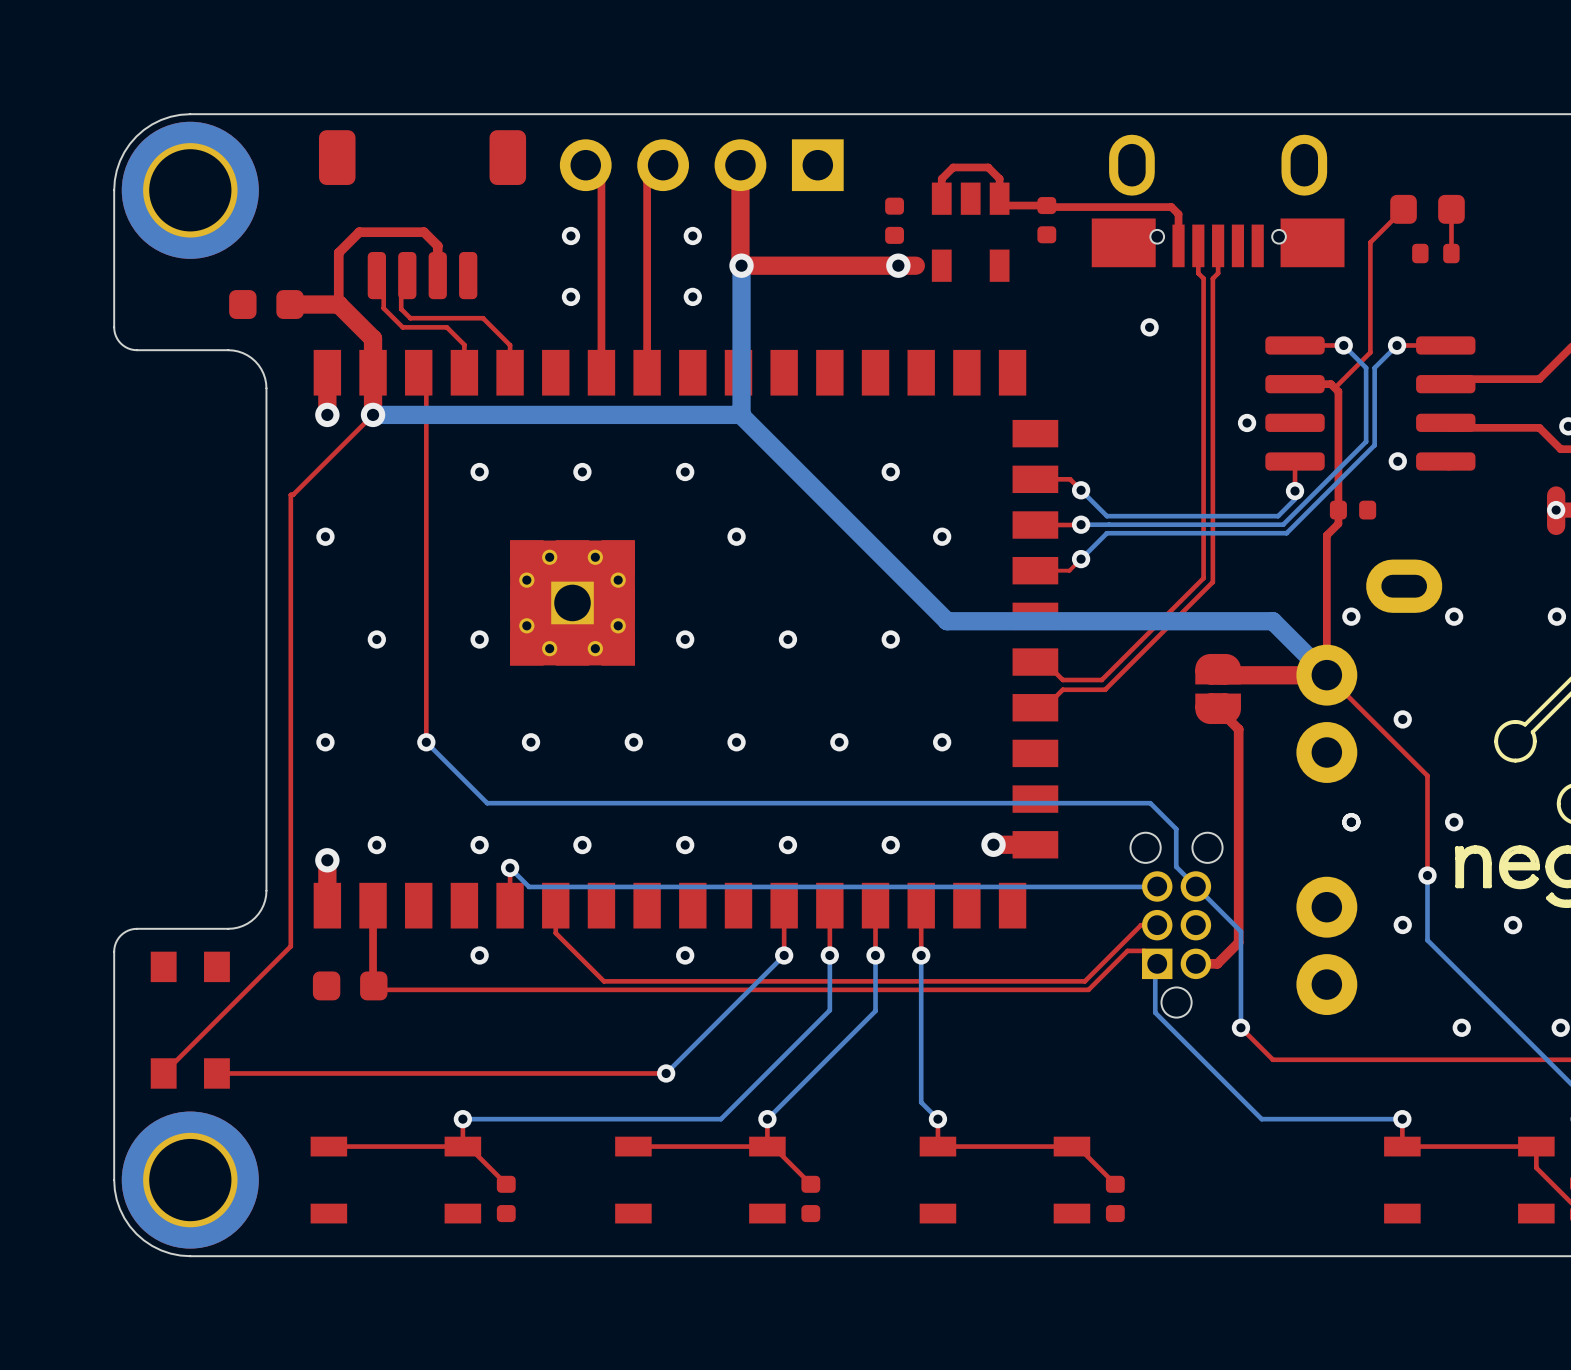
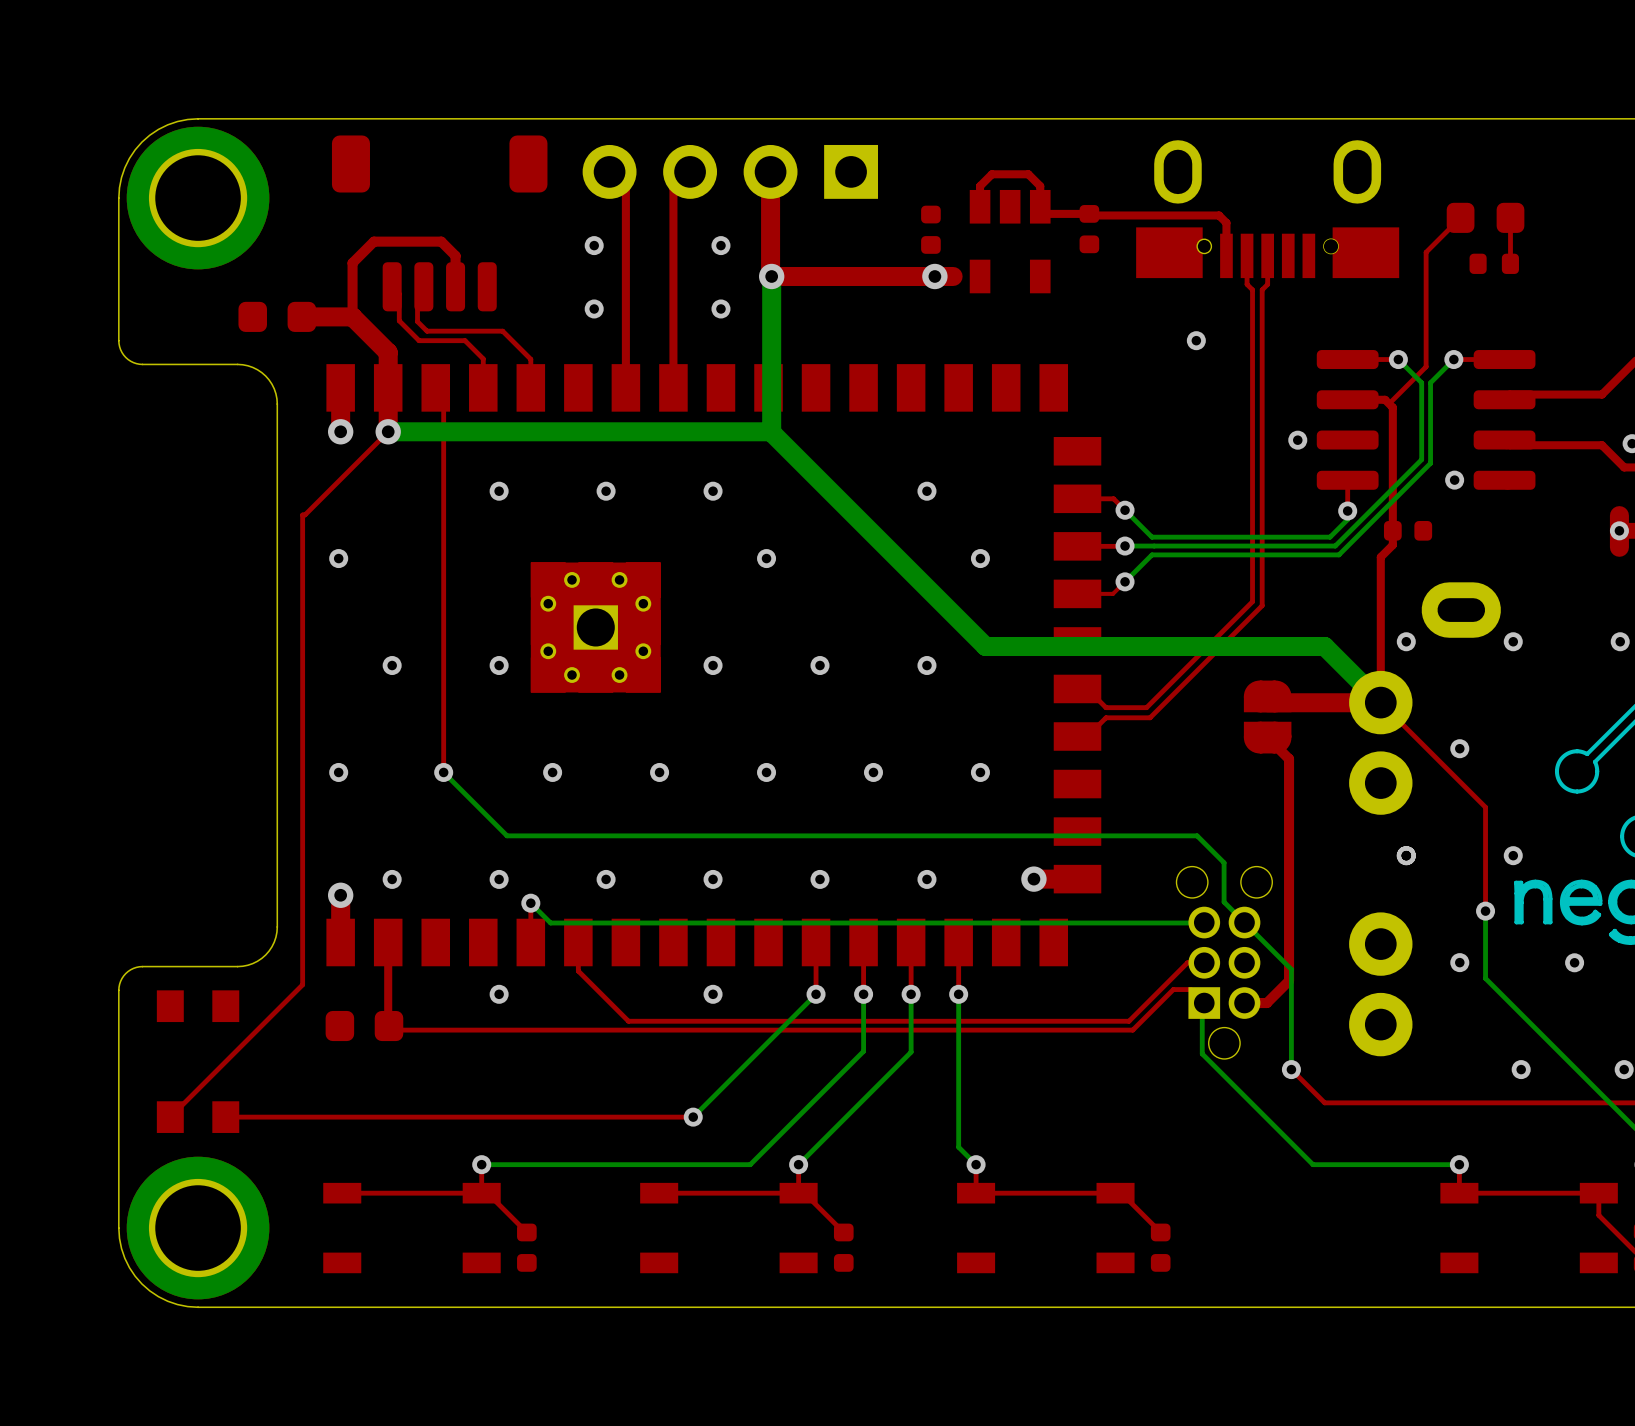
part footprint: [1091, 134, 1345, 268] -> [1136, 140, 1400, 279]

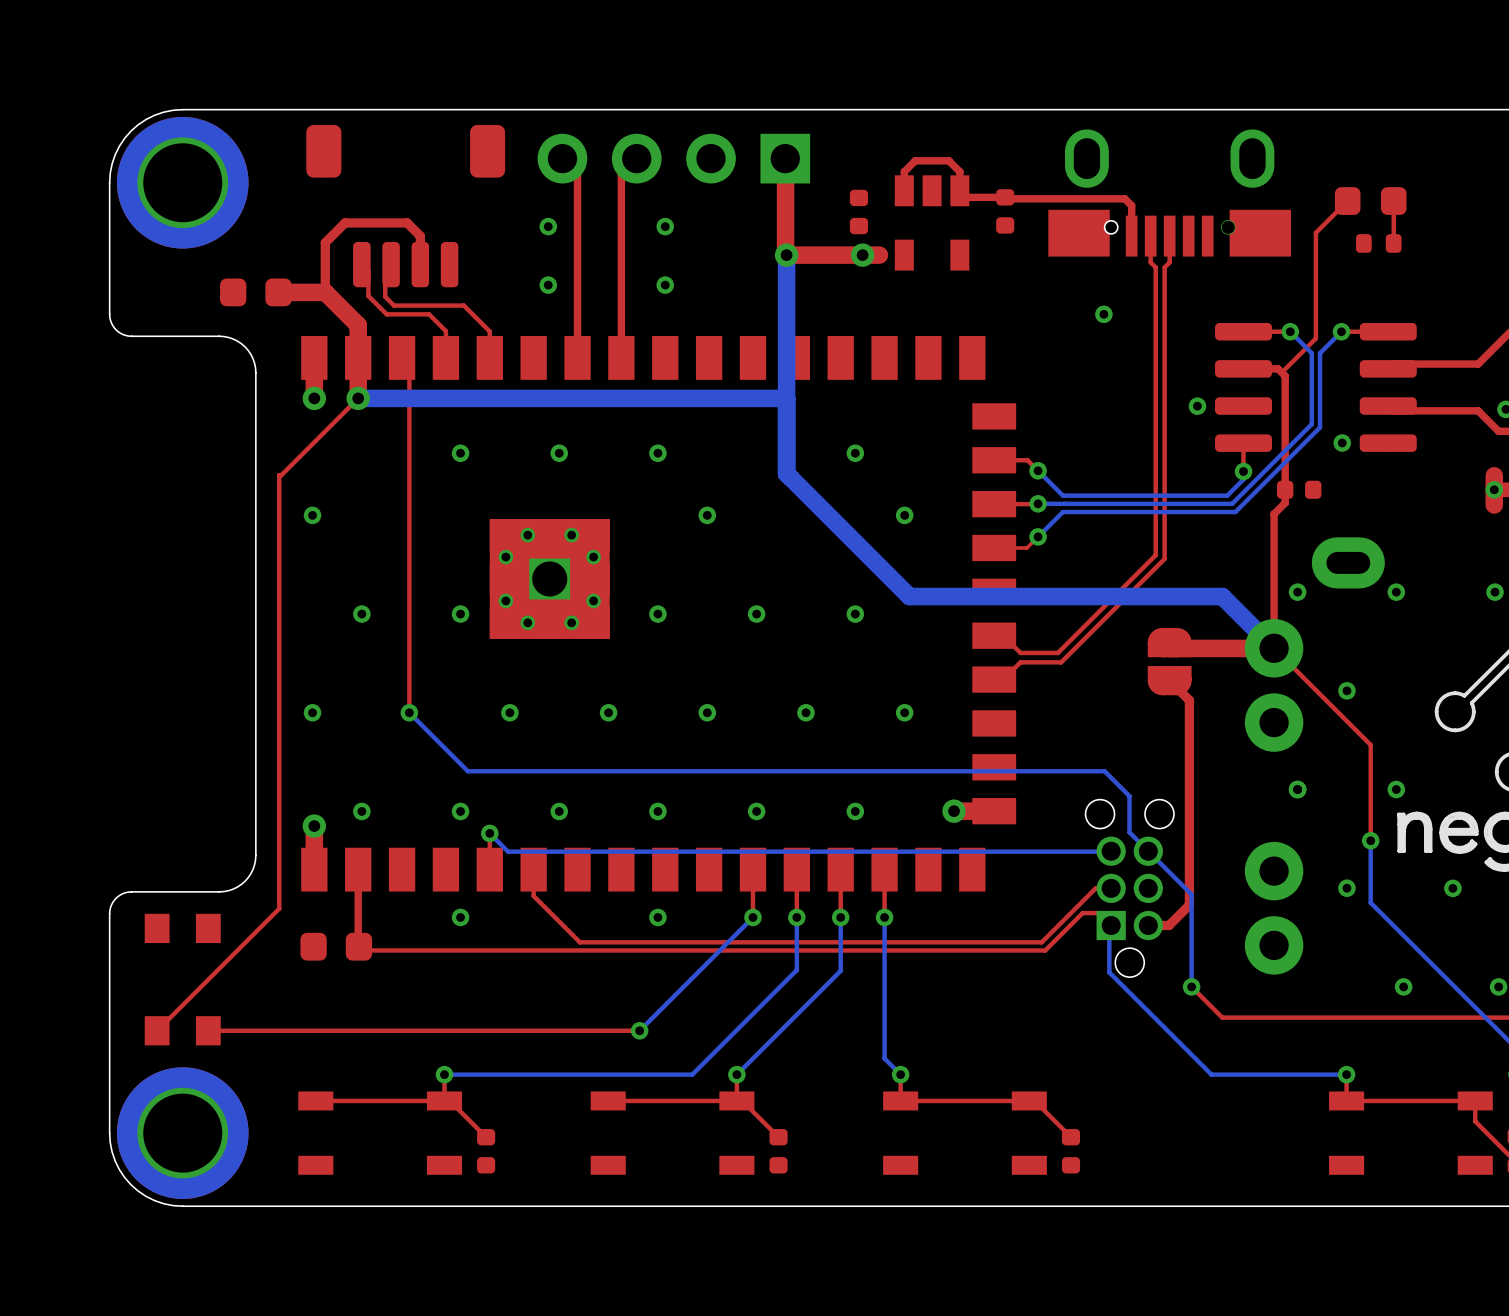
top track: (770, 171) (770, 275) (852, 276) -> (785, 158) (786, 255)
bottom track: (771, 276) (771, 432) (852, 513) -> (786, 255) (786, 473)
via position: (771, 276) -> (786, 255)
bottom track: none -> (786, 398) (712, 398)

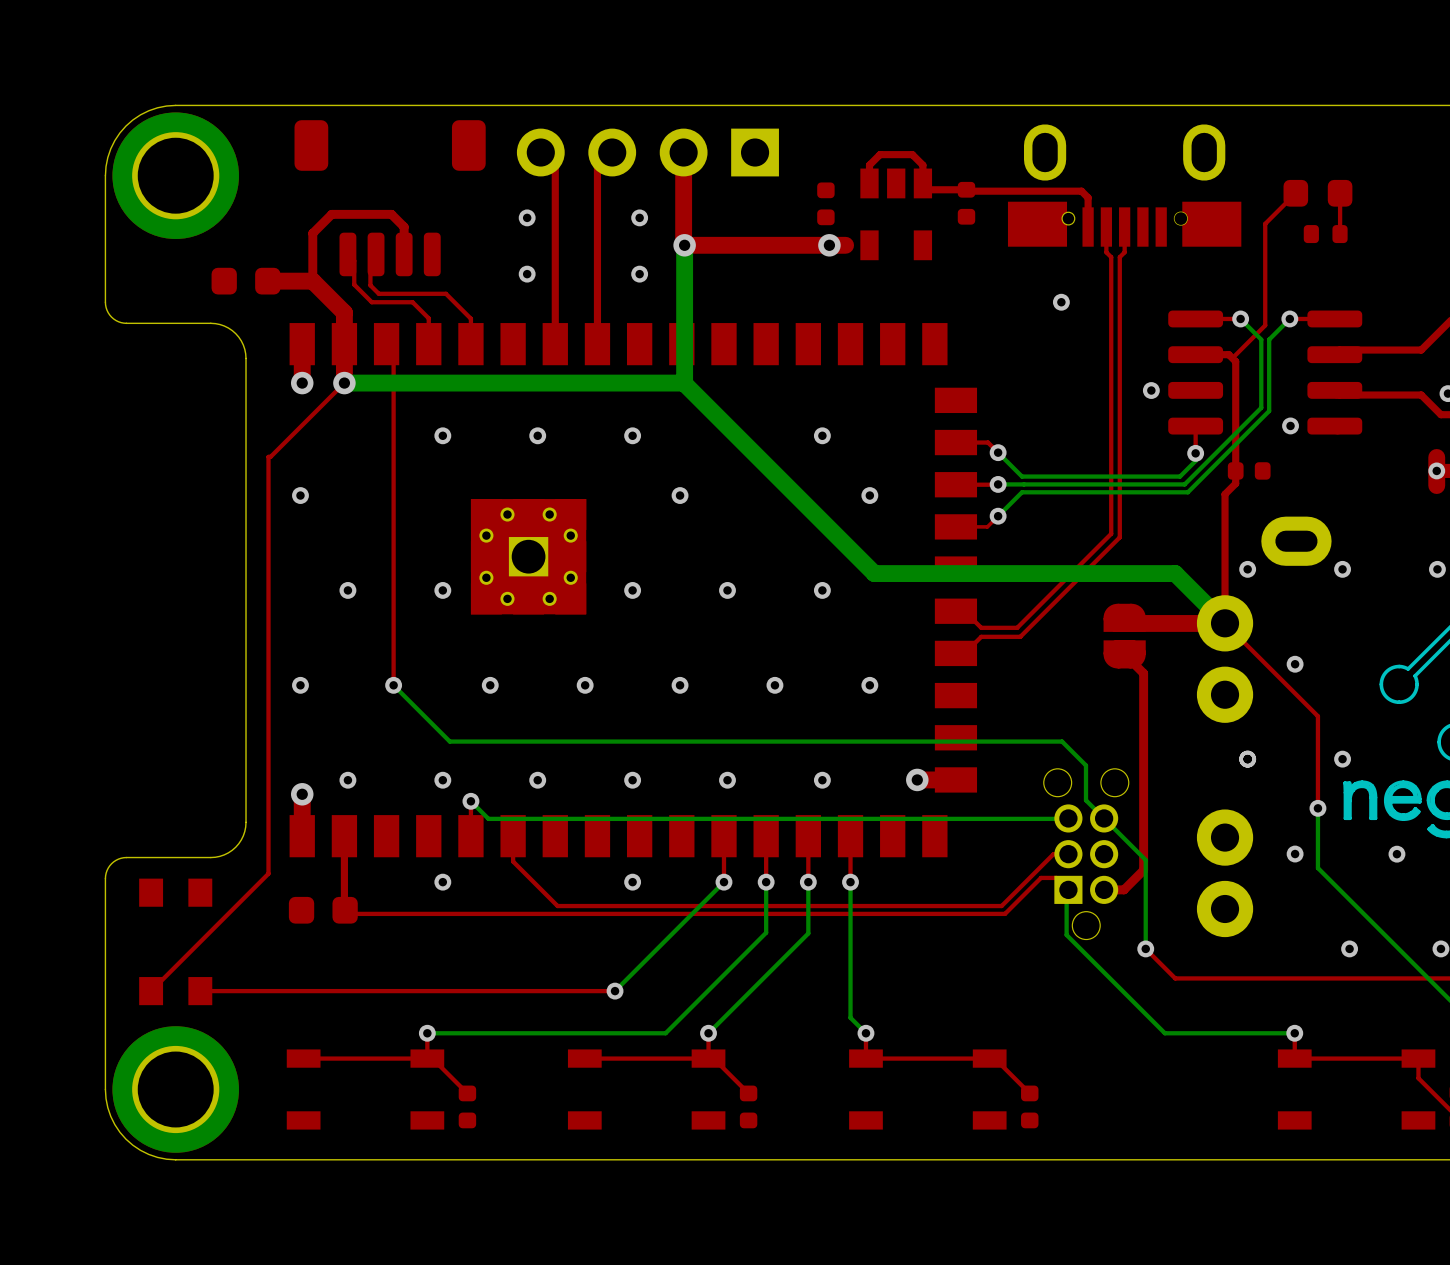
top track: (785, 158) (786, 255) -> (683, 152) (683, 244) (756, 245)
bottom track: (786, 255) (786, 473) -> (684, 245) (684, 383) (756, 455)
via position: (786, 255) -> (684, 245)
bottom track: (786, 398) (712, 398) -> none

